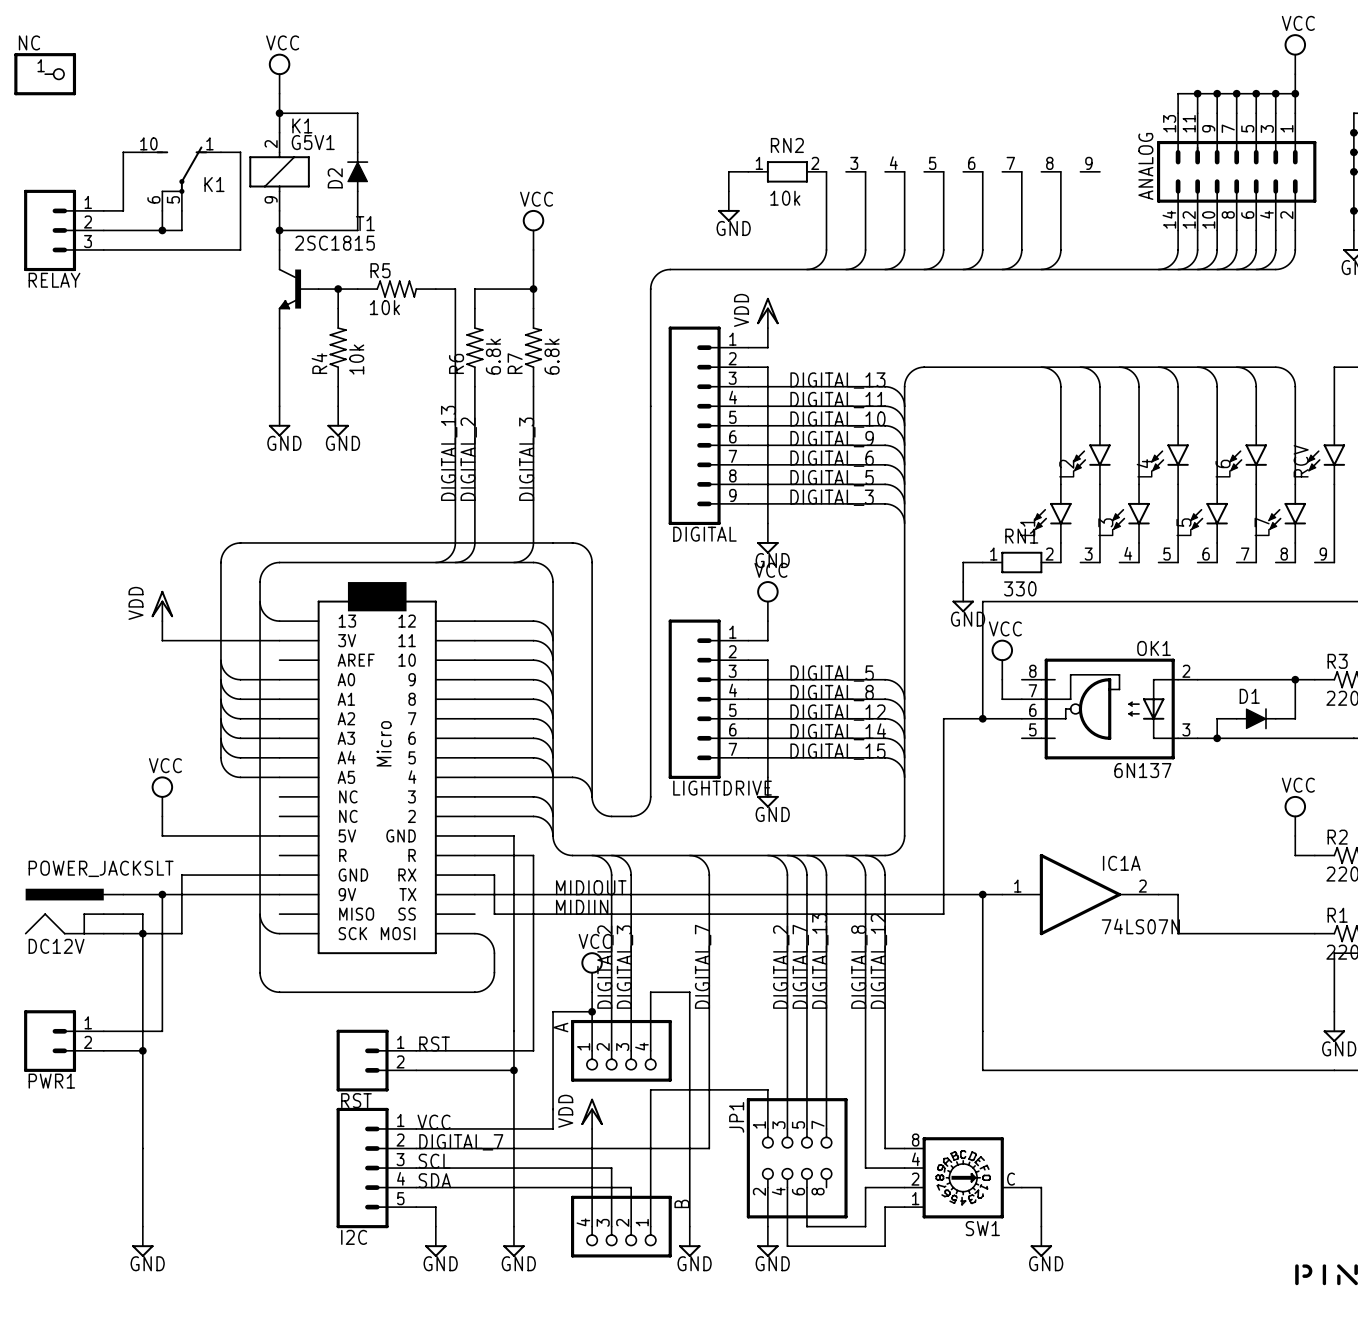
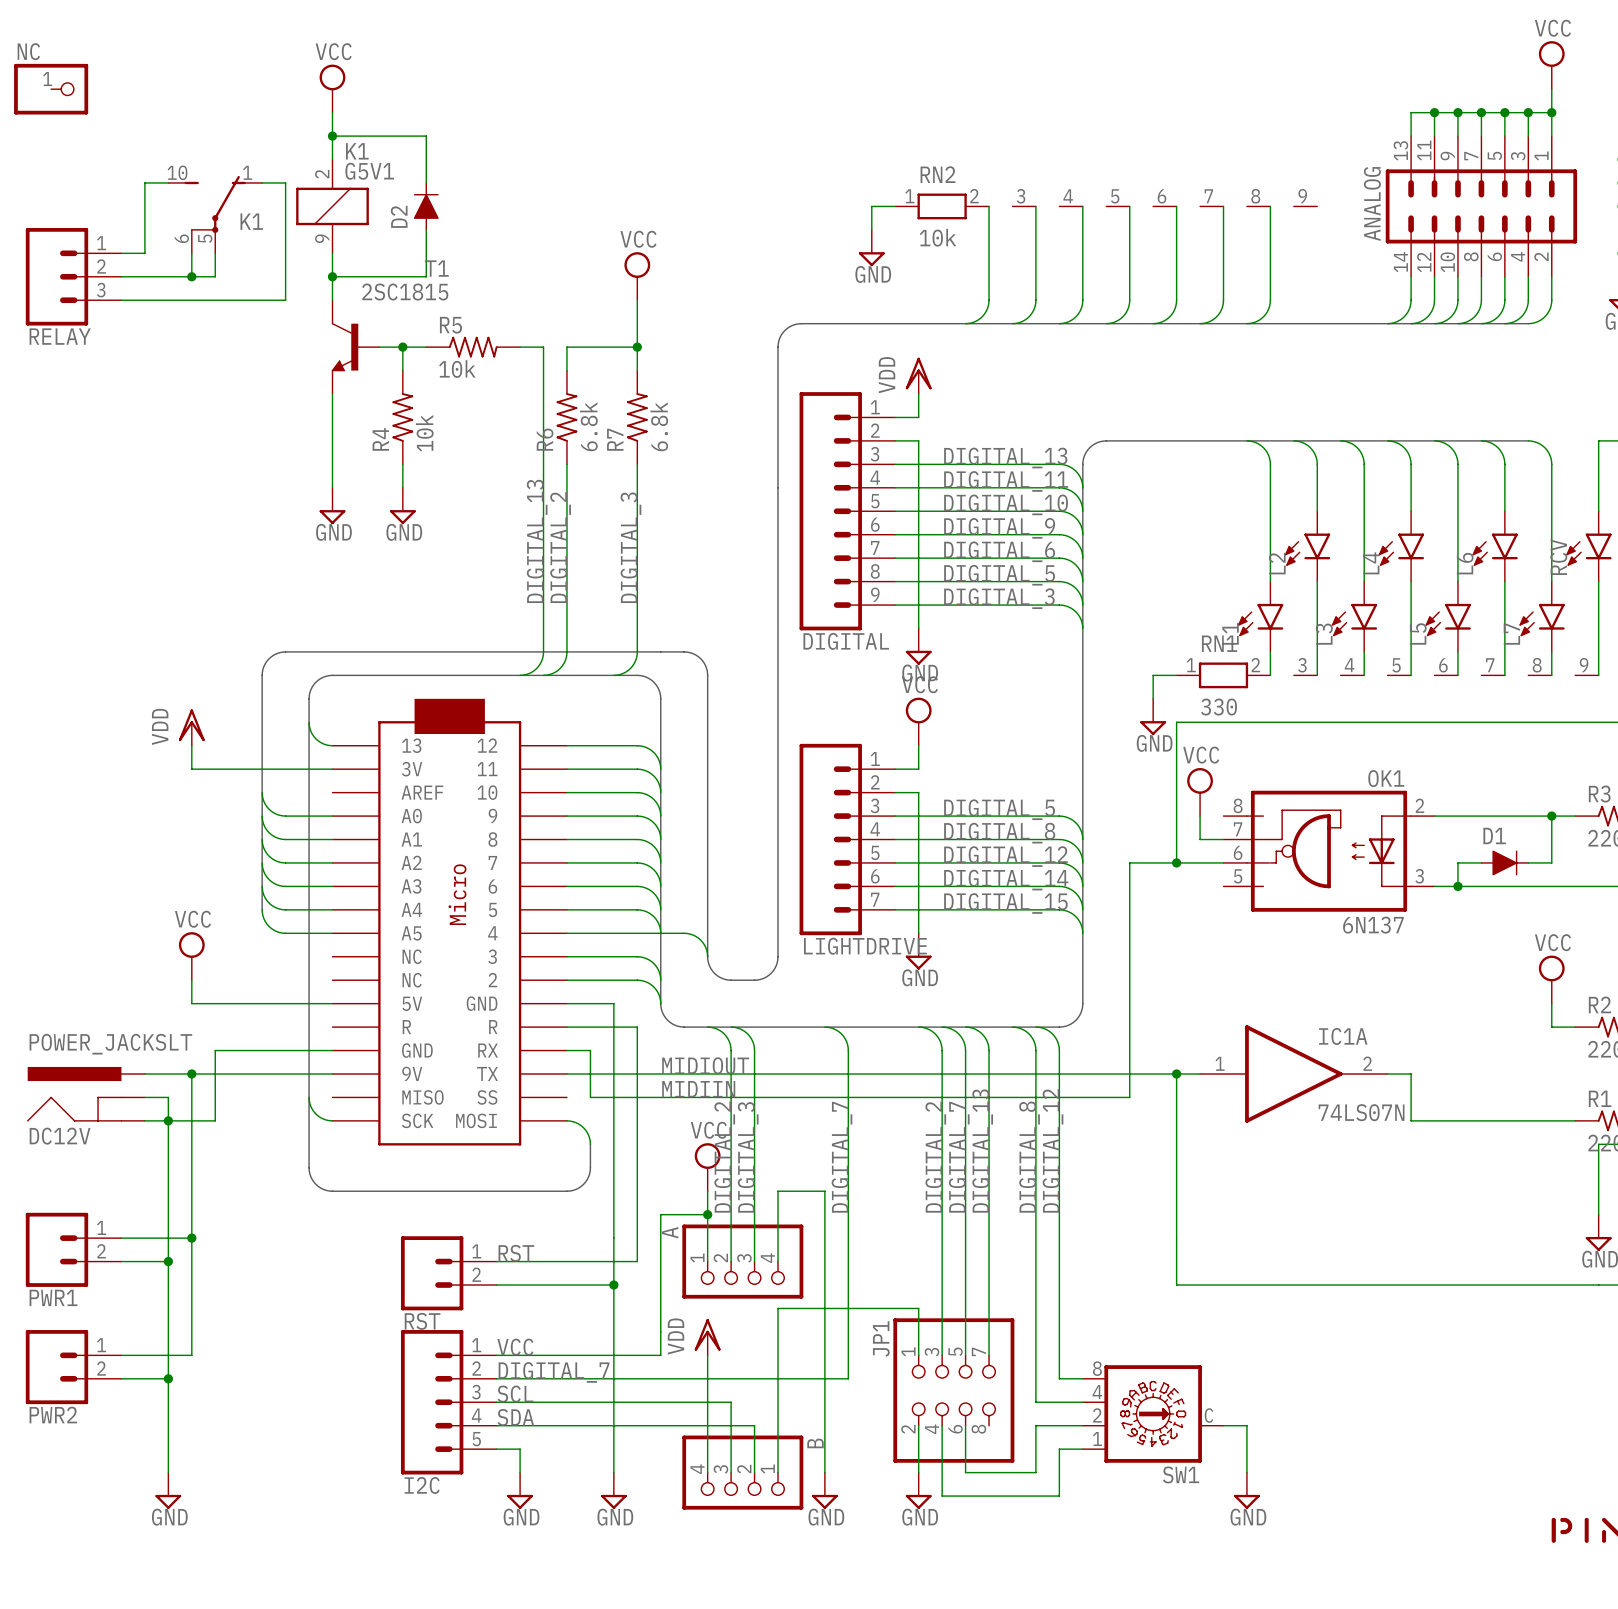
wire: none -> (191, 1238) (191, 1355) (121, 1355)
junction: none -> (191, 1238)
PWR2: none -> (73, 1367)
wire: none -> (121, 1378) (168, 1378)
junction: none -> (168, 1378)

